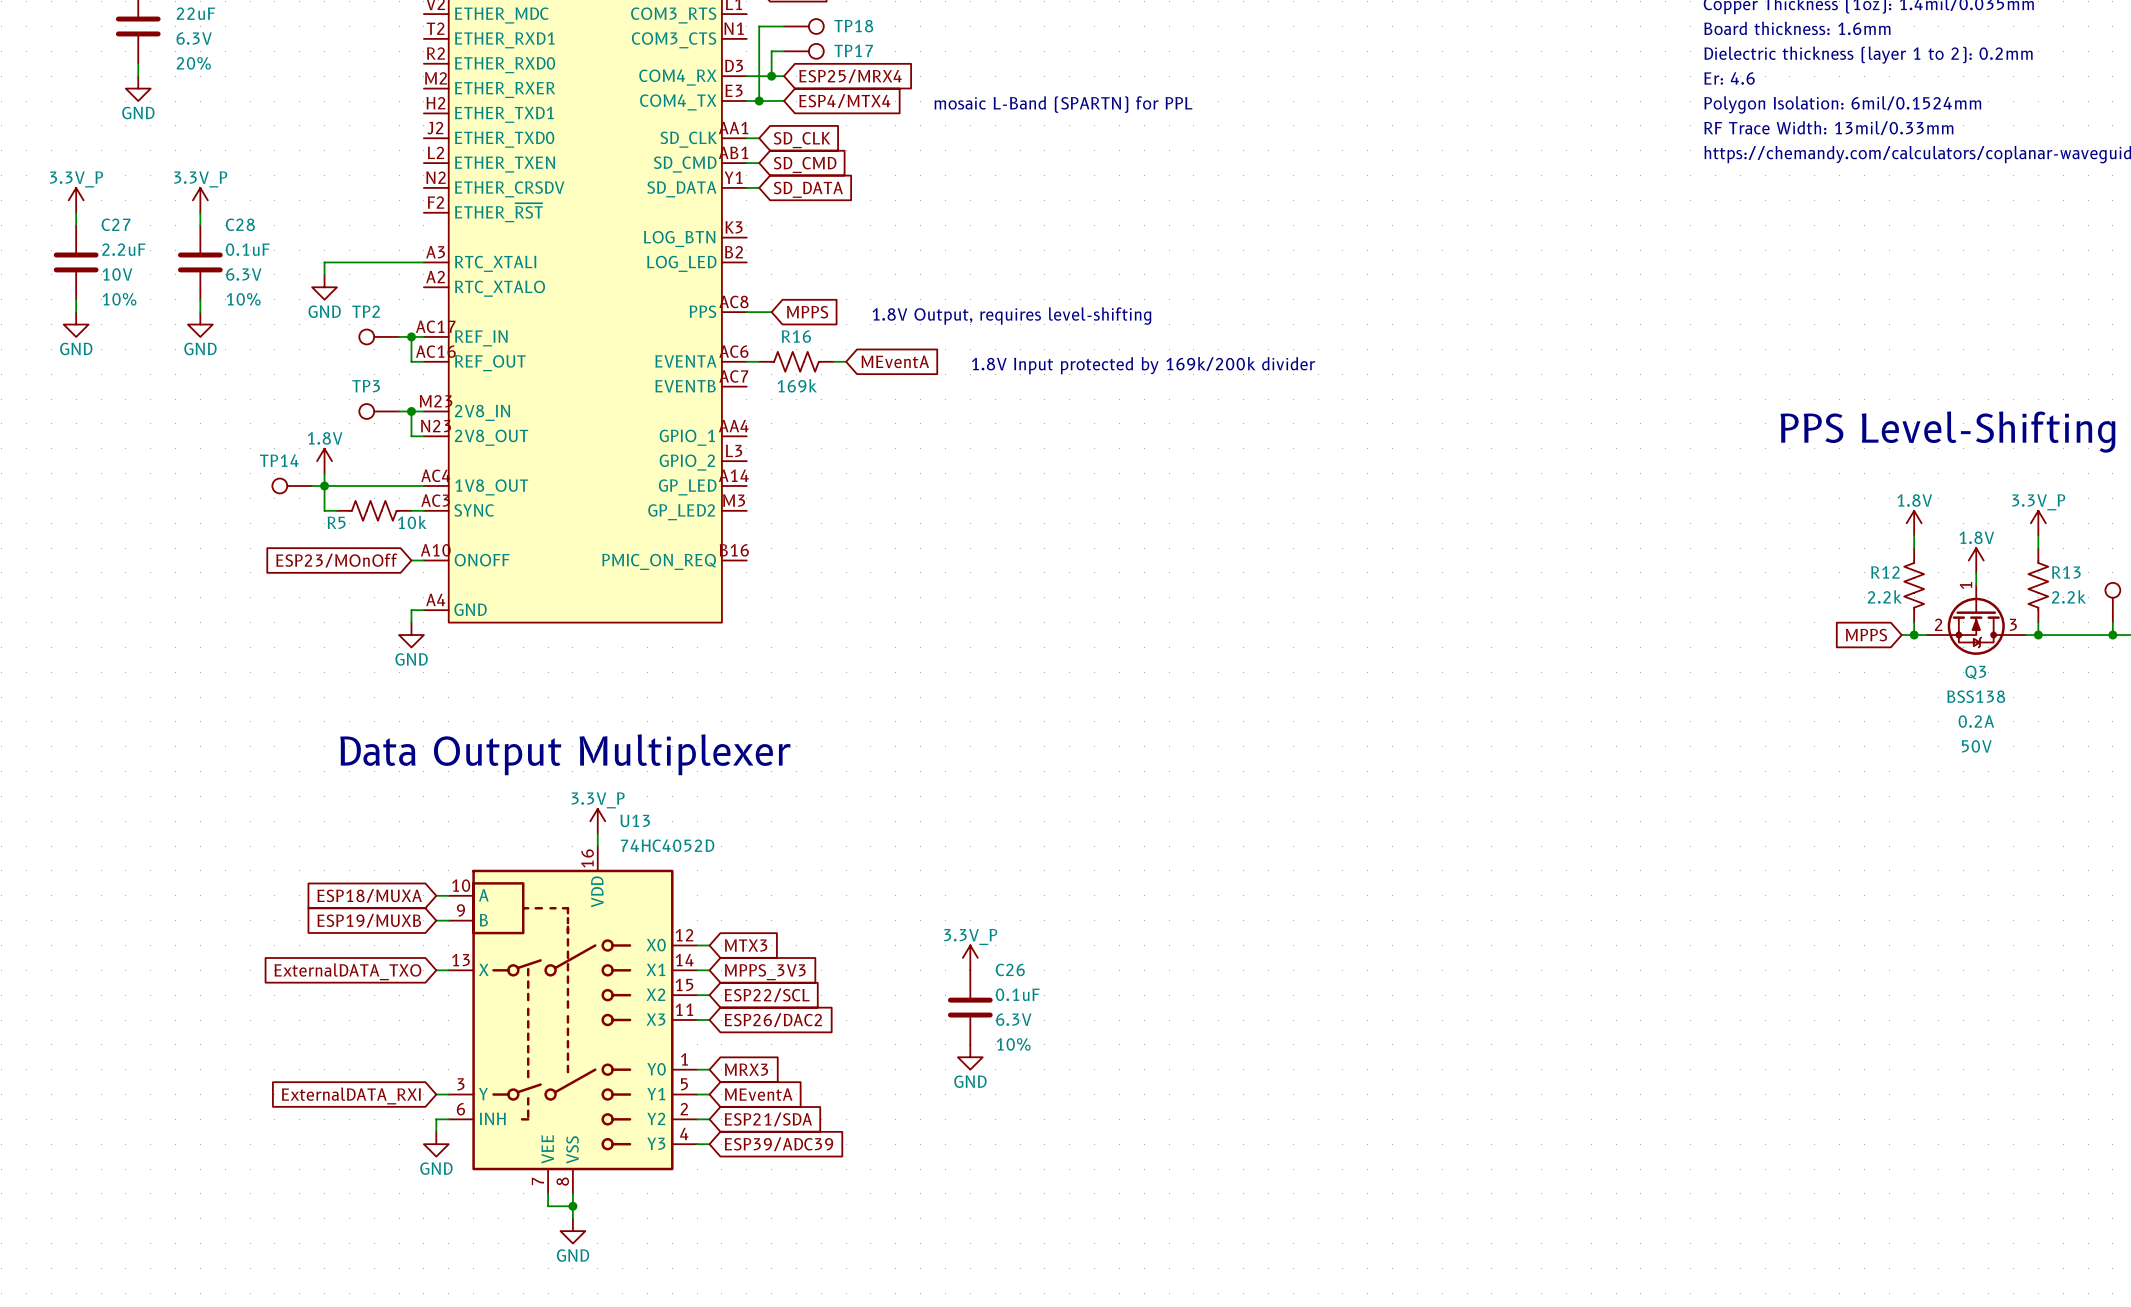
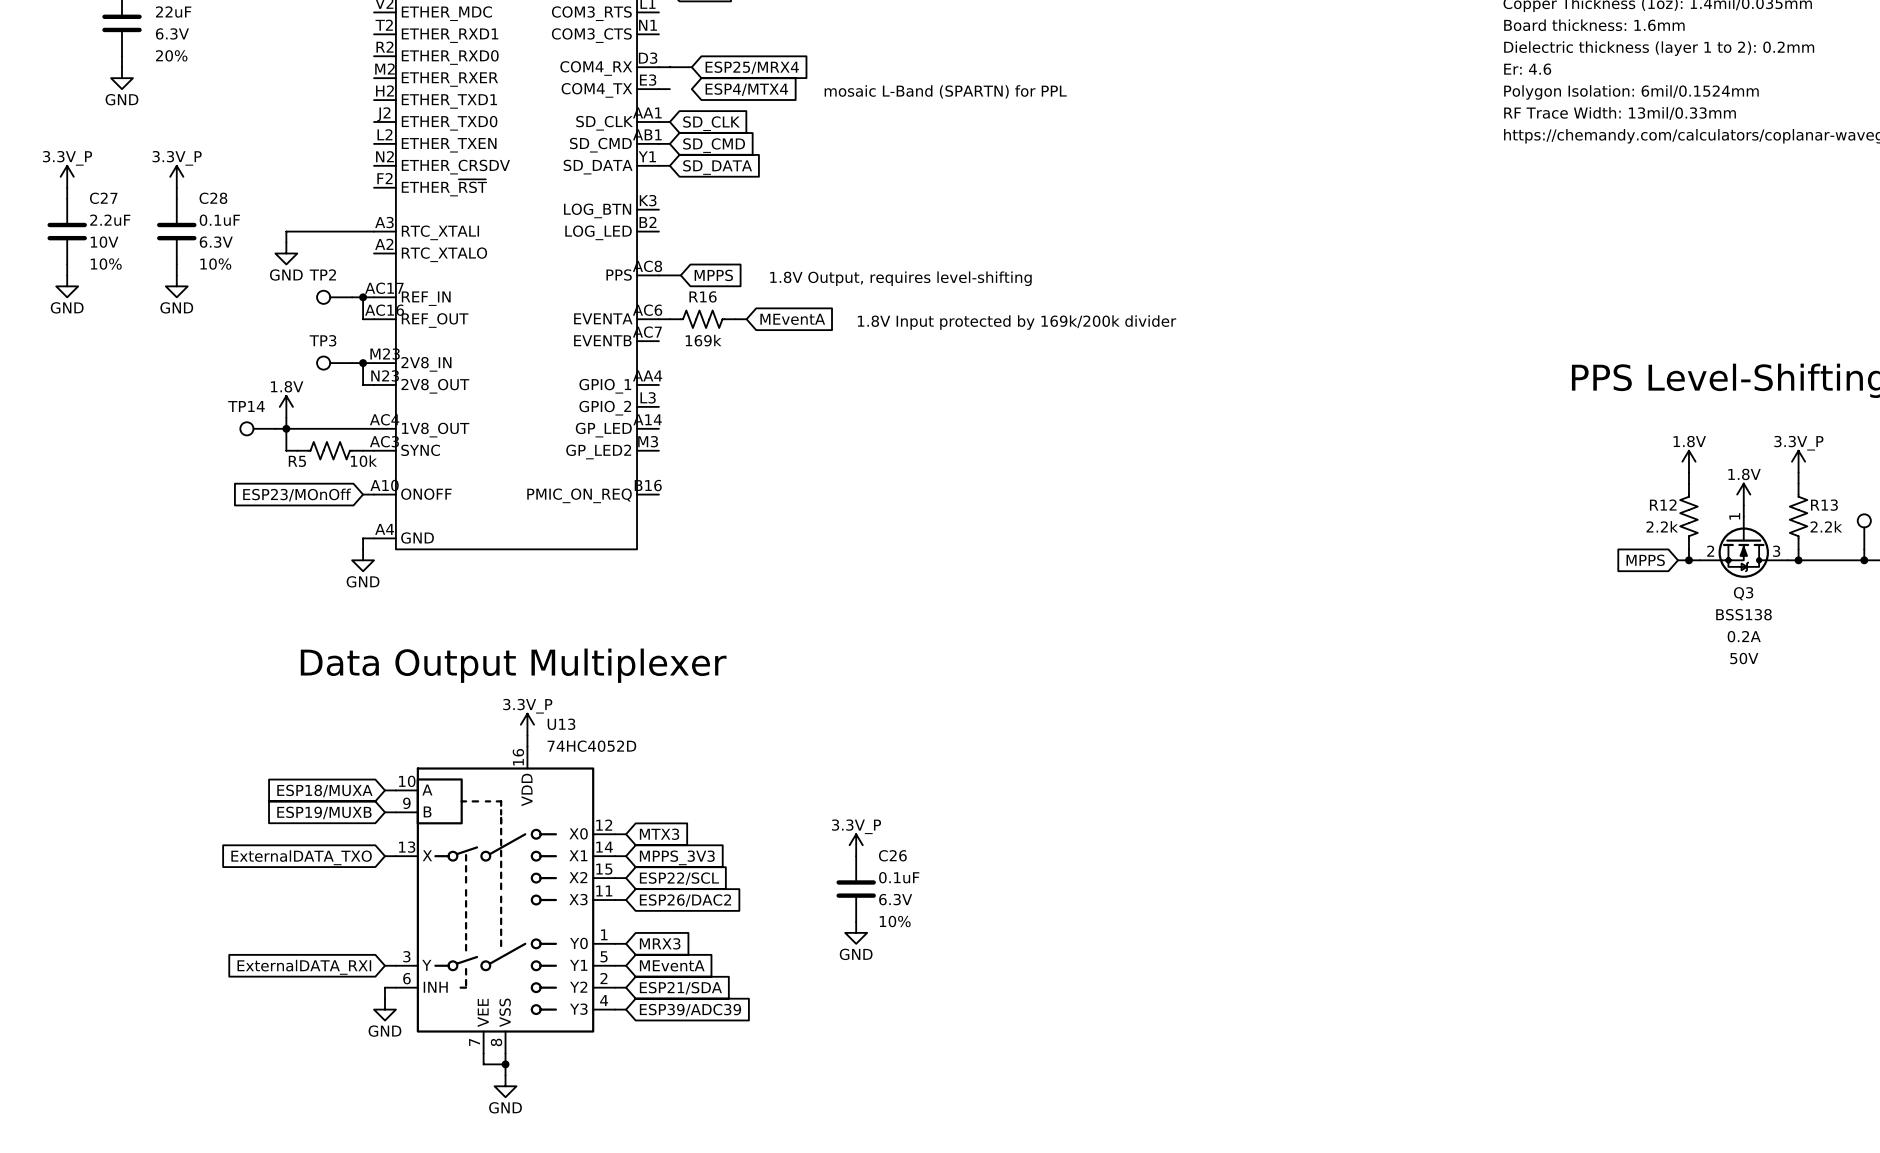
wire: (784, 26) (759, 26) (759, 101) (784, 101) -> none
TP18: (803, 26) -> none
wire: (784, 51) (771, 51) (771, 76) -> none
TP17: (803, 51) -> none
junction: (771, 76) -> none
junction: (759, 101) -> none

